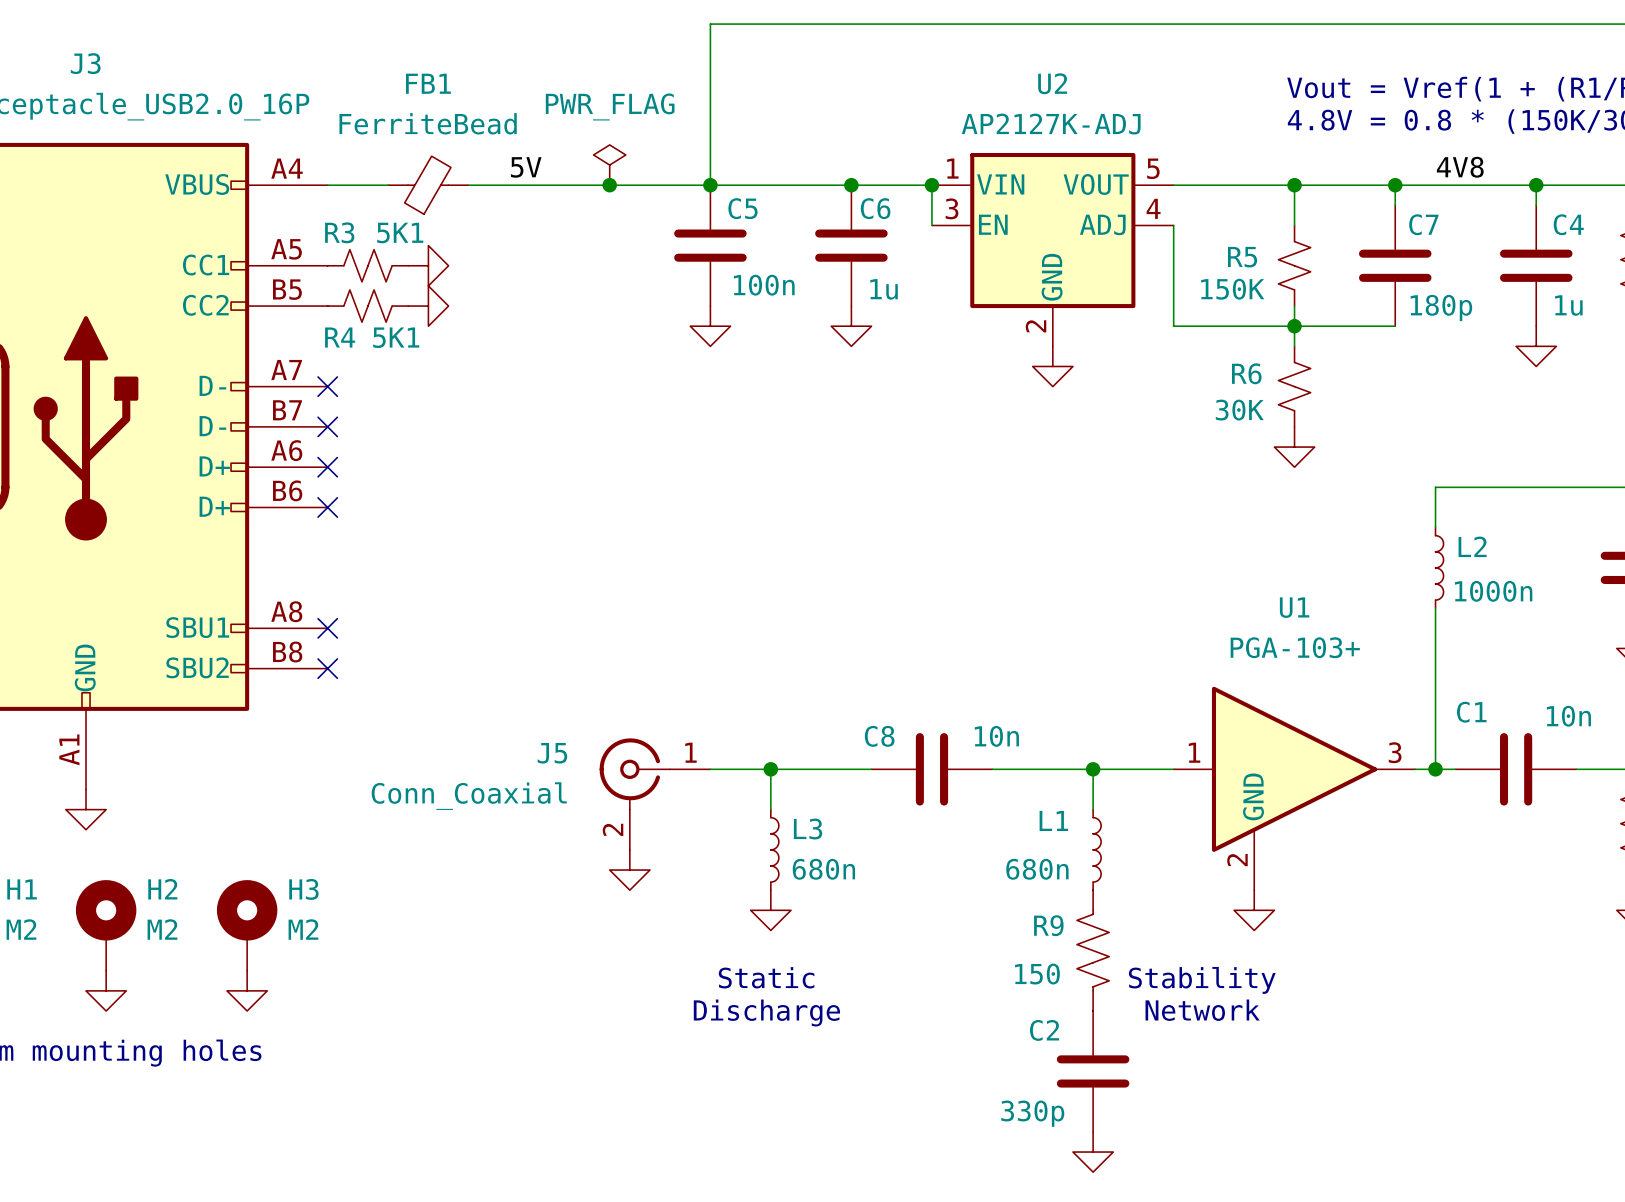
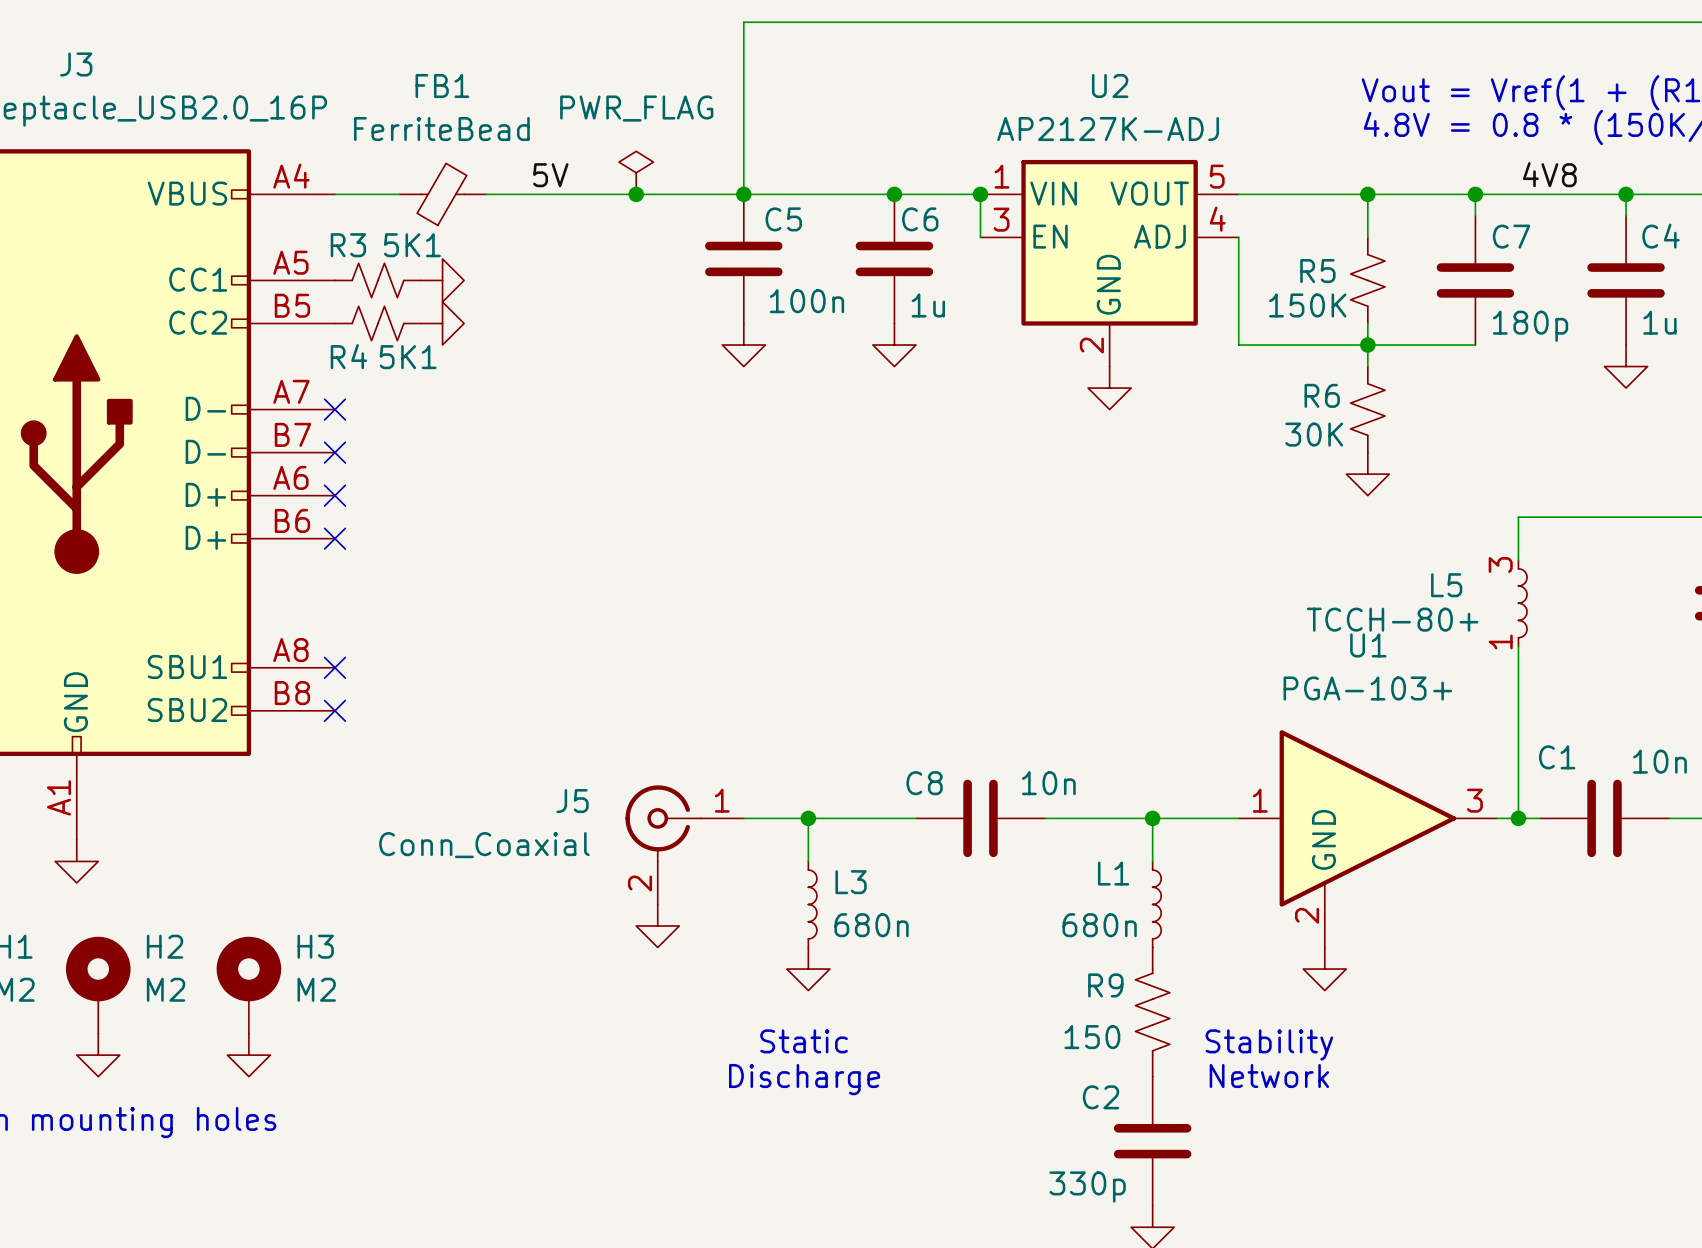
L2 pin number: none -> 3 (1500, 565)
L2 name: L2 (1472, 546) -> L5 (1446, 585)
L2 value: 1000n (1493, 591) -> TCCH-80+ (1392, 619)
L2 pin number: none -> 1 (1500, 641)

